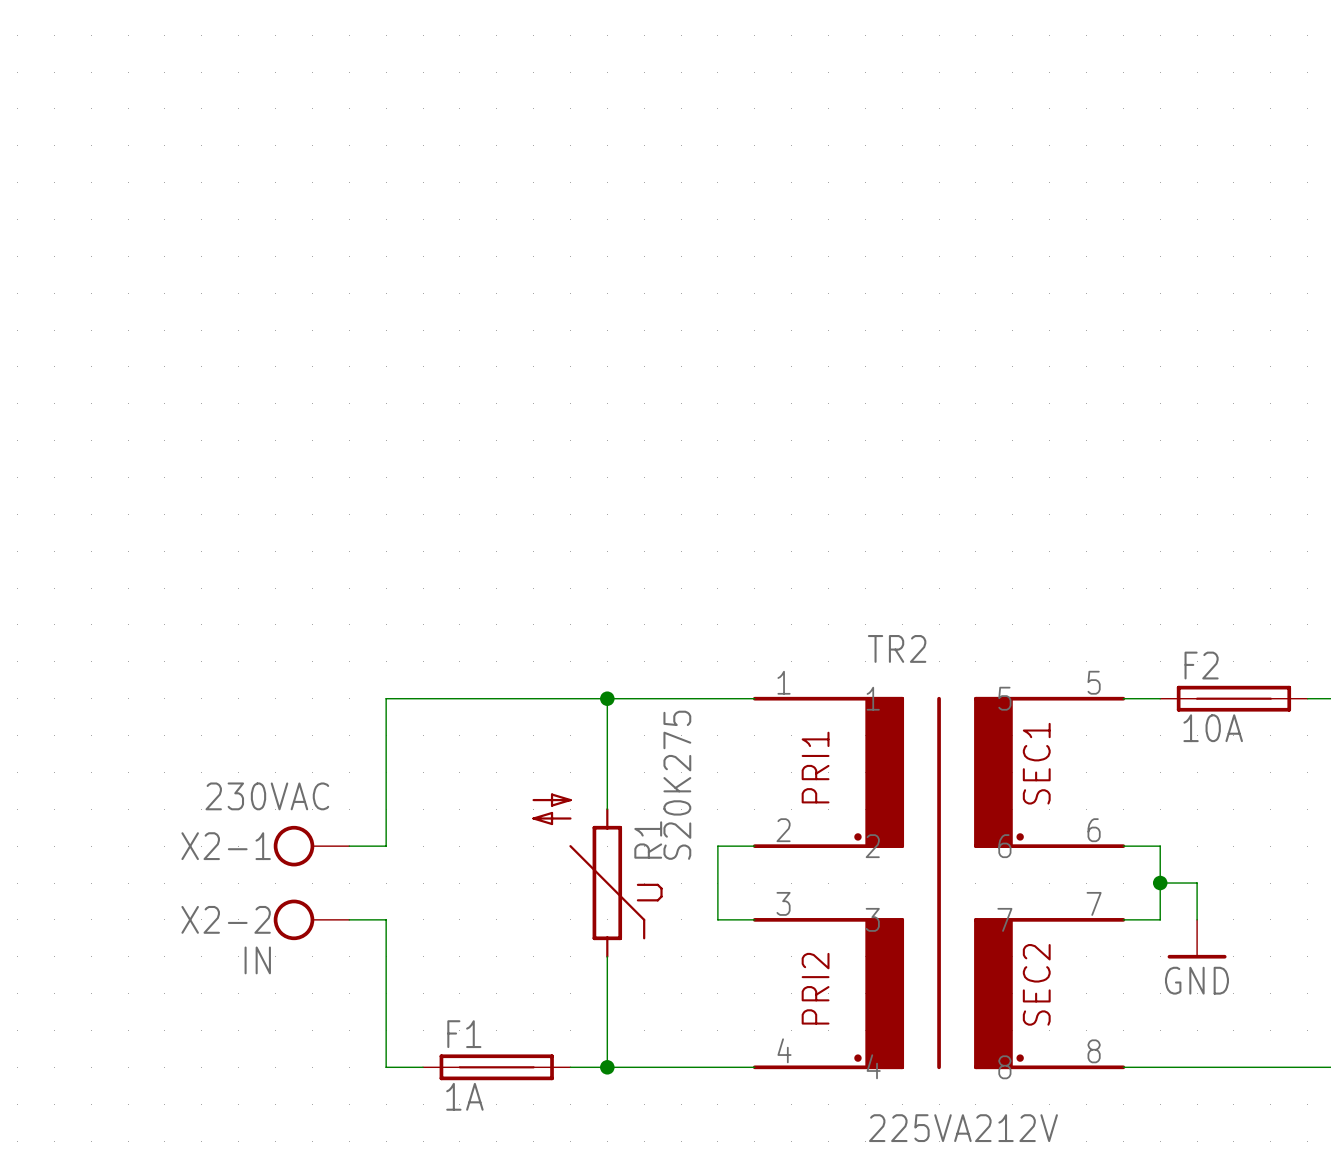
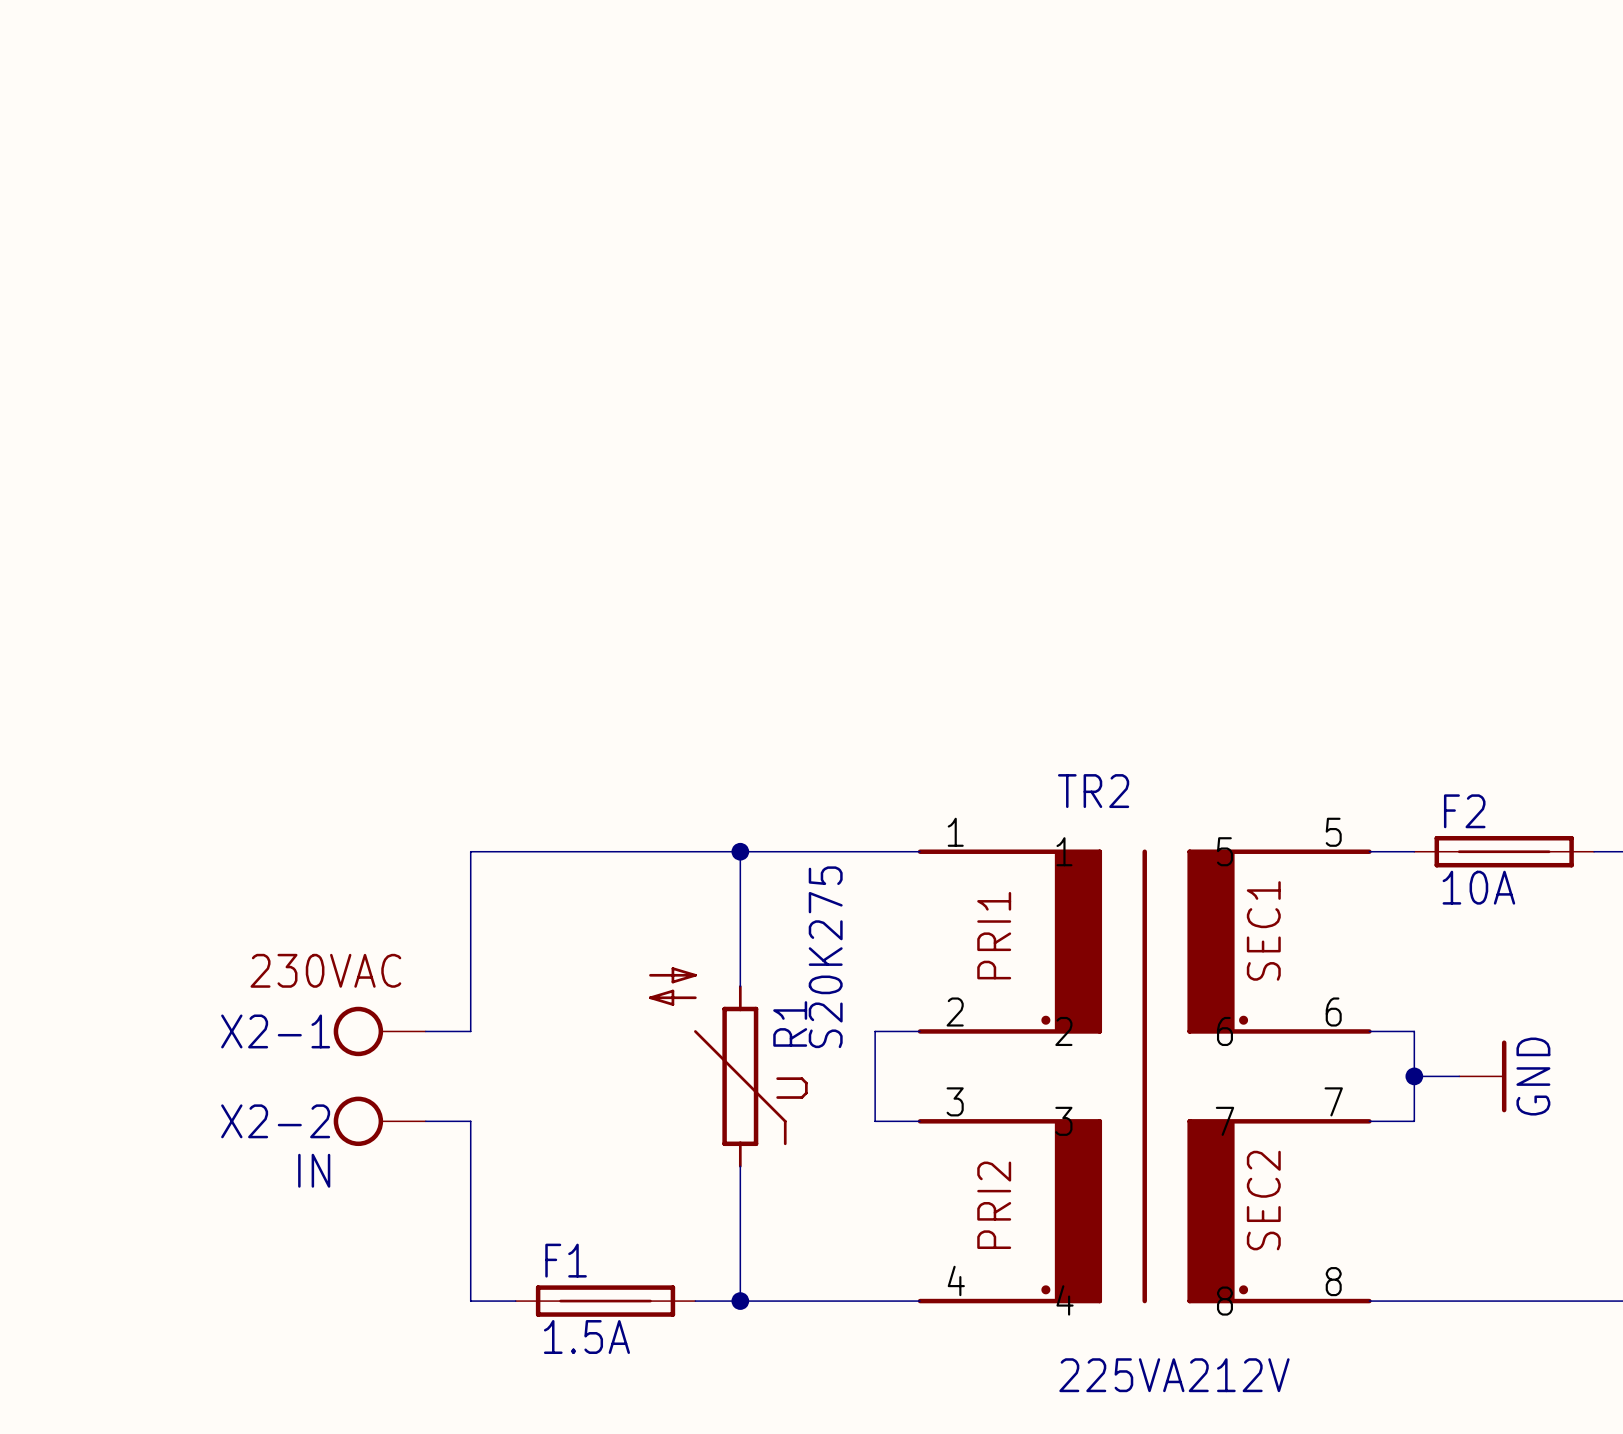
wire: (1197, 883) (1197, 919) -> none
power symbol position: GND (1197, 939) -> GND (1482, 1076)
power symbol rotation: 0° (1197, 956) -> 90° counterclockwise (1504, 1076)
F1 value: 1A (464, 1096) -> 1.5A (586, 1337)

